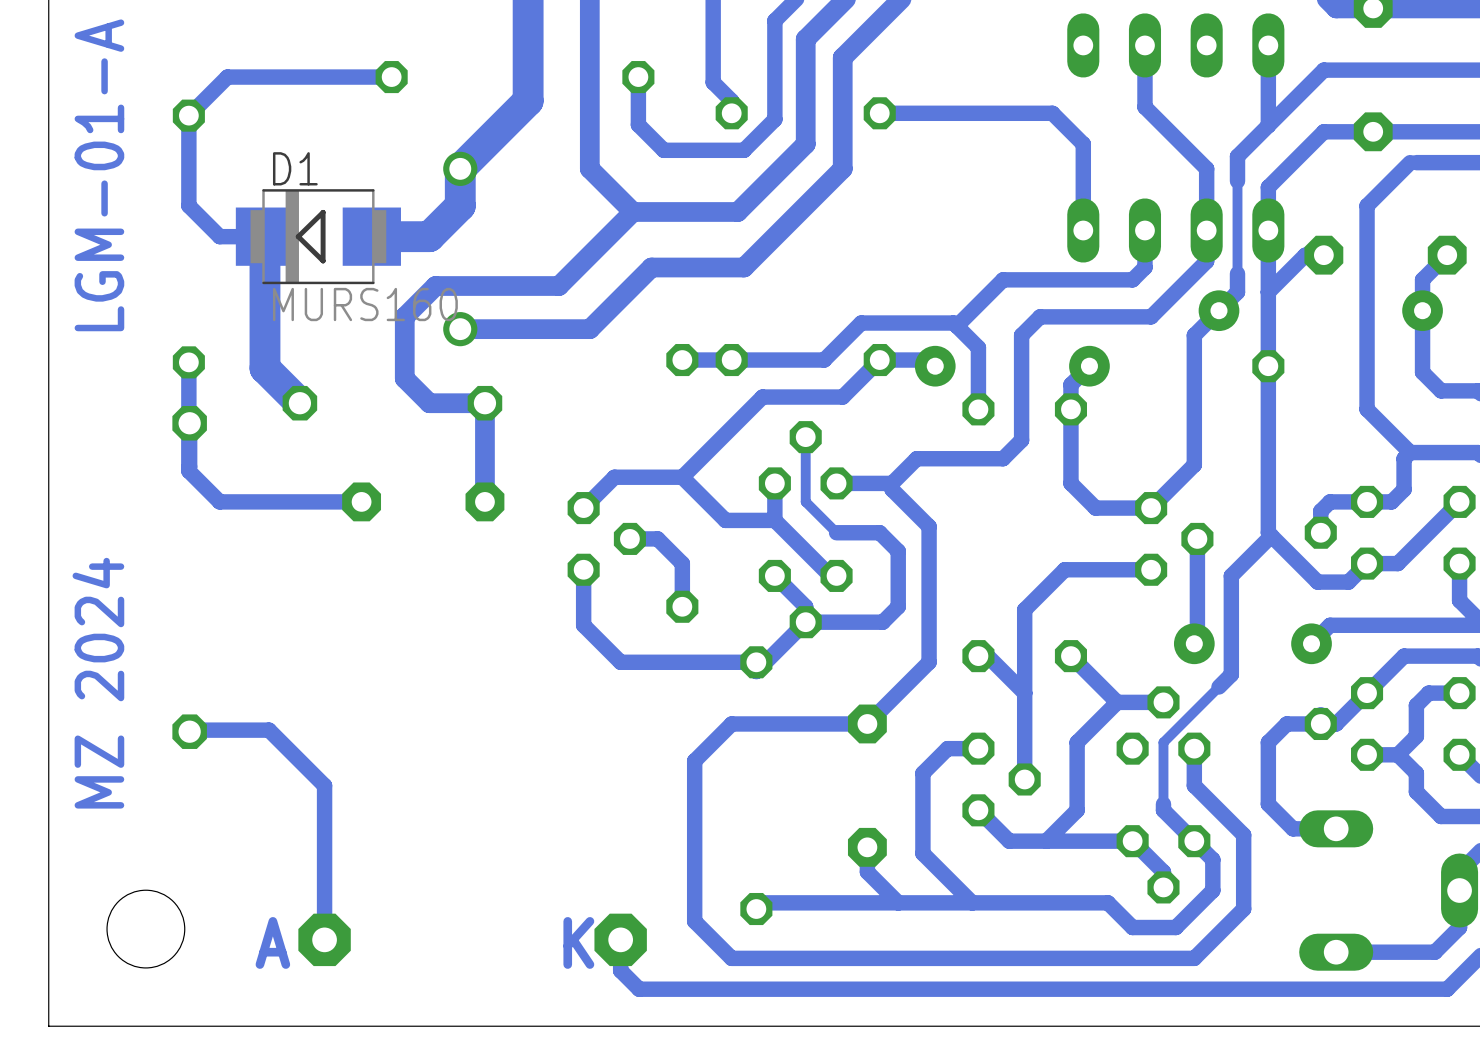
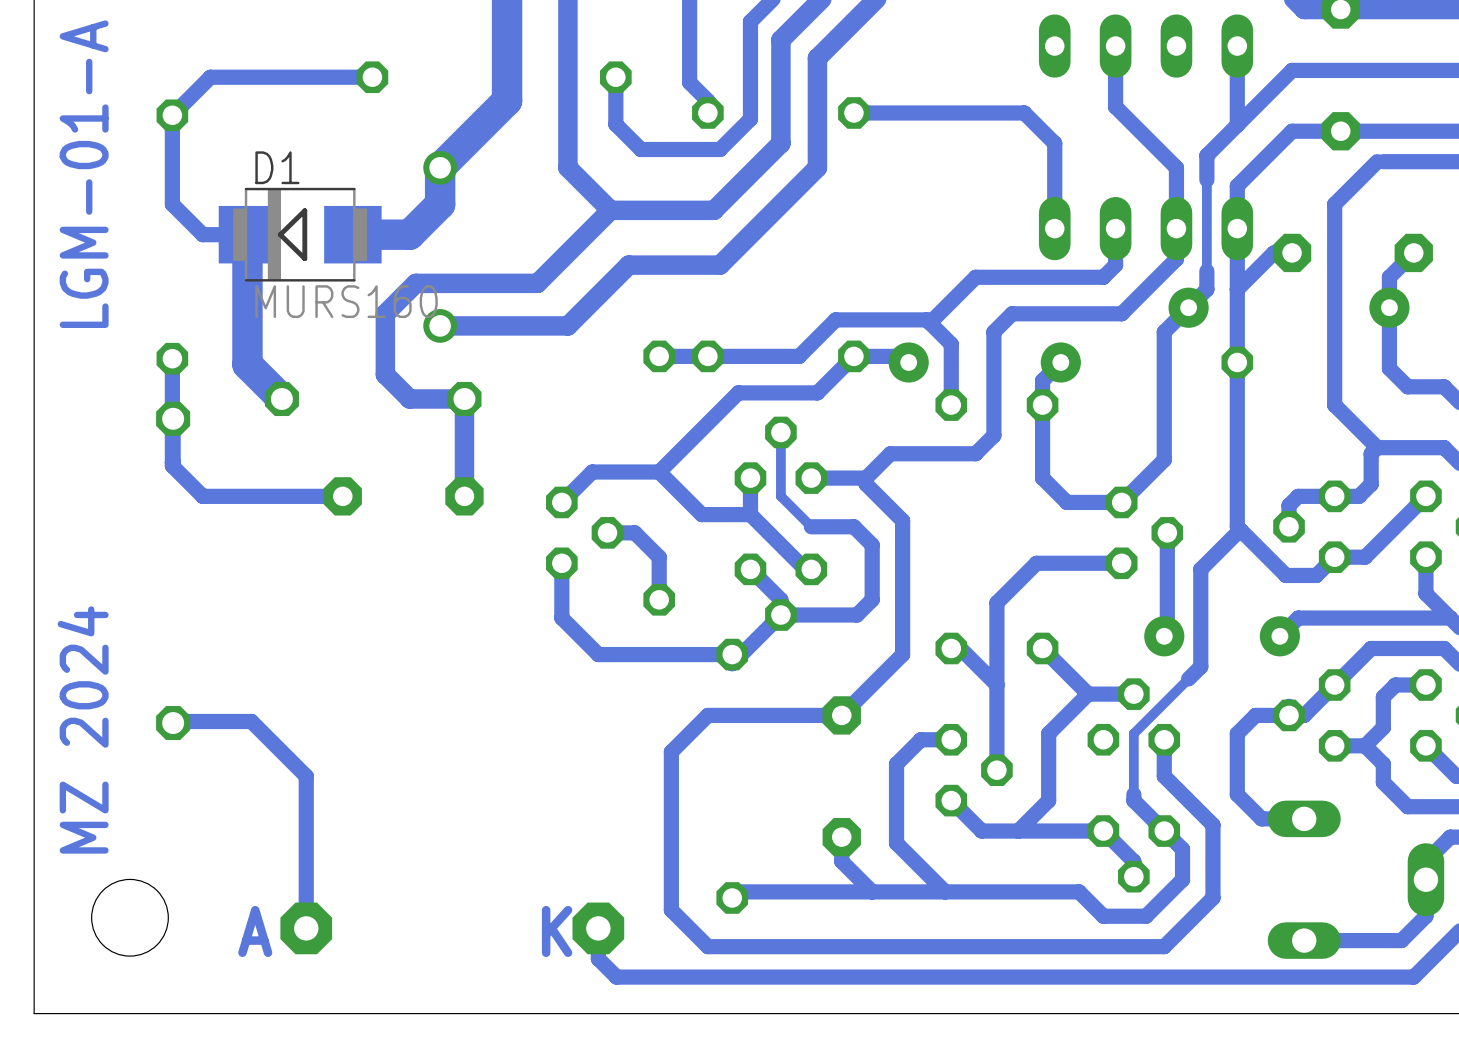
text position: MZ 2024 (98, 683) -> MZ 2024 (83, 729)

